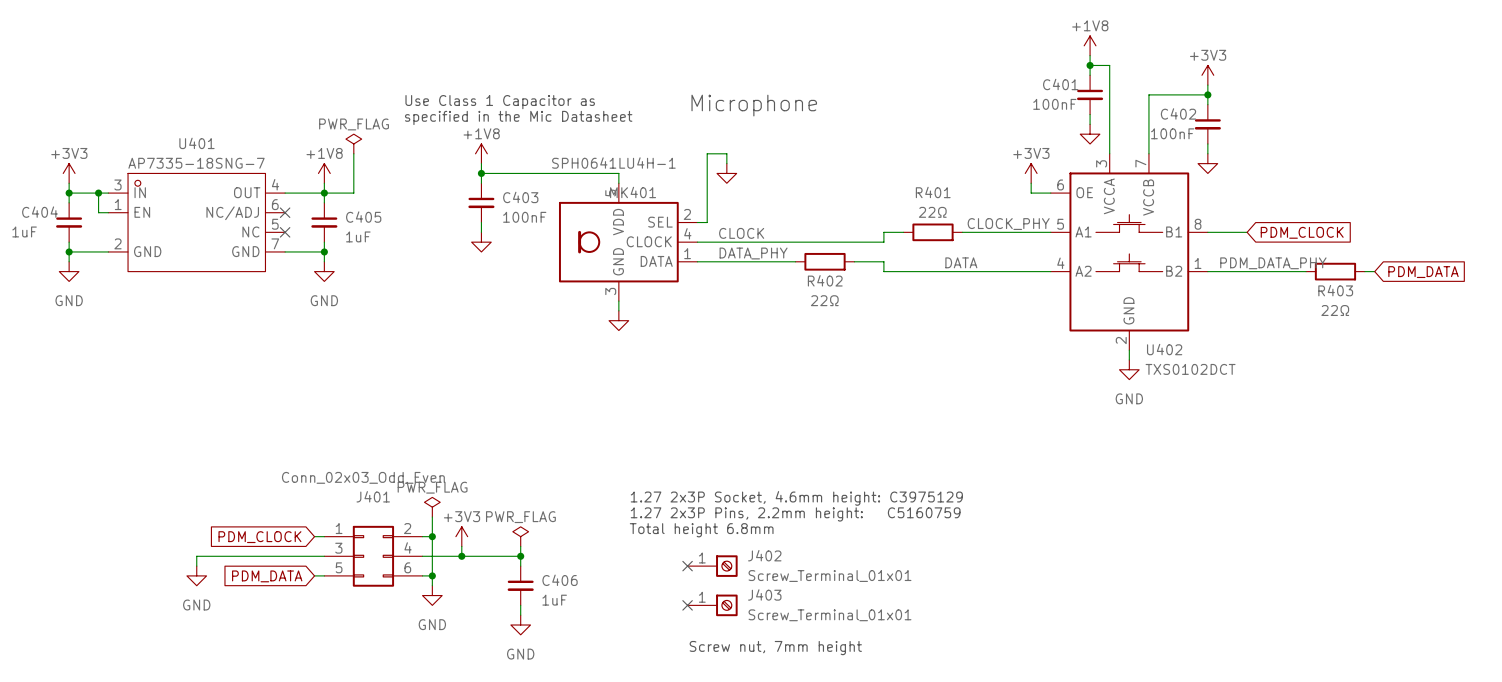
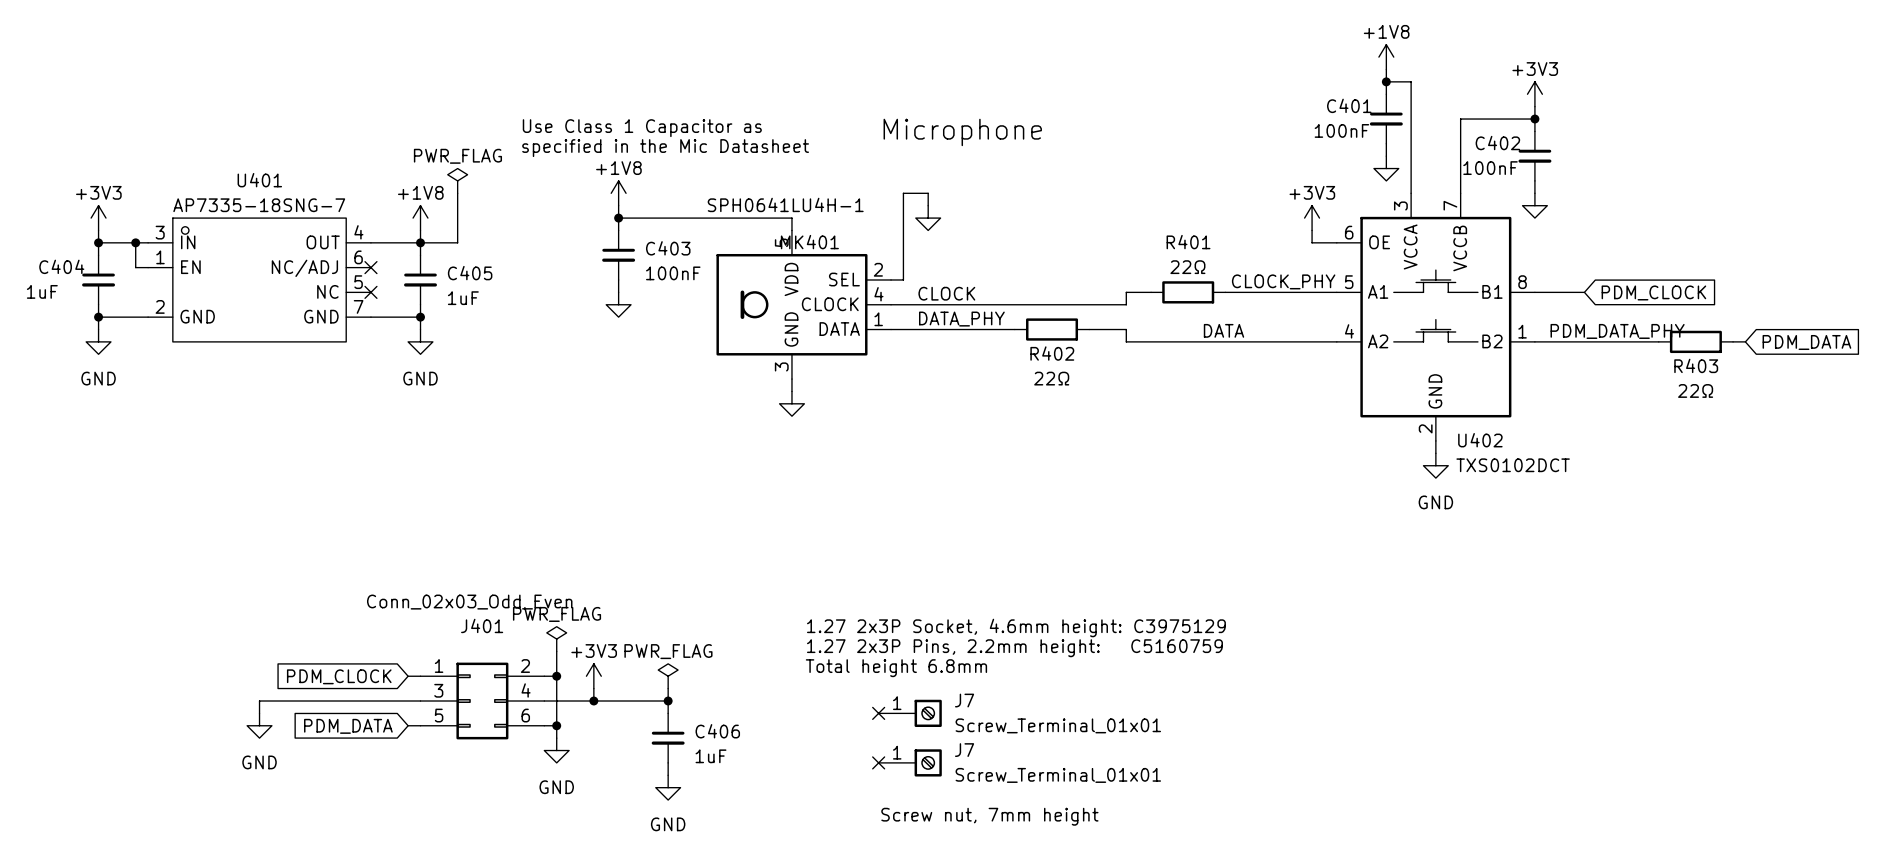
J402 name: J402 (764, 555) -> J7 (964, 700)
J403 name: J403 (764, 594) -> J7 (964, 750)

